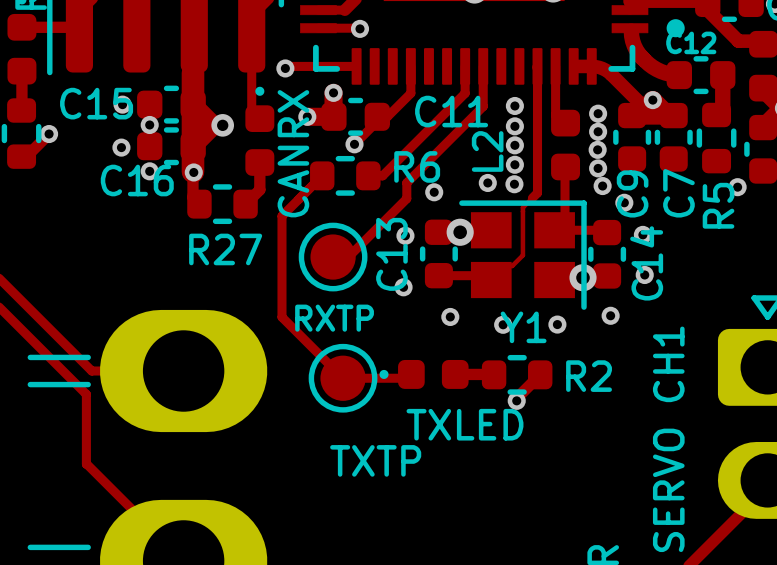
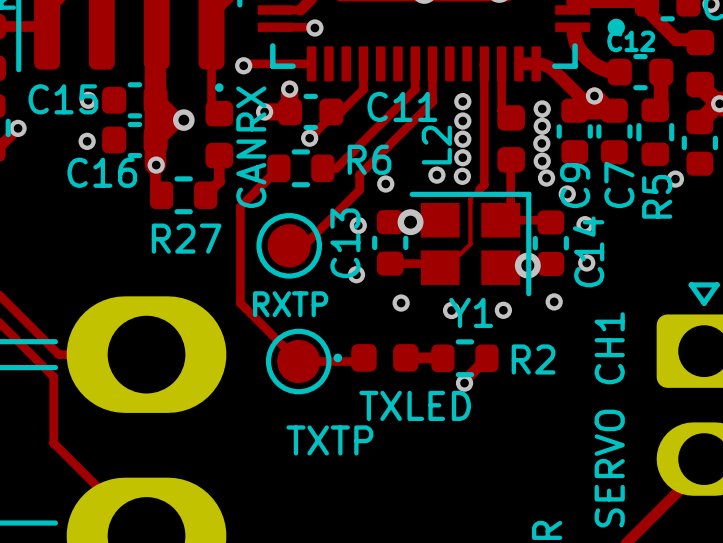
via: (149, 124) -> none
via: (149, 171) -> none

